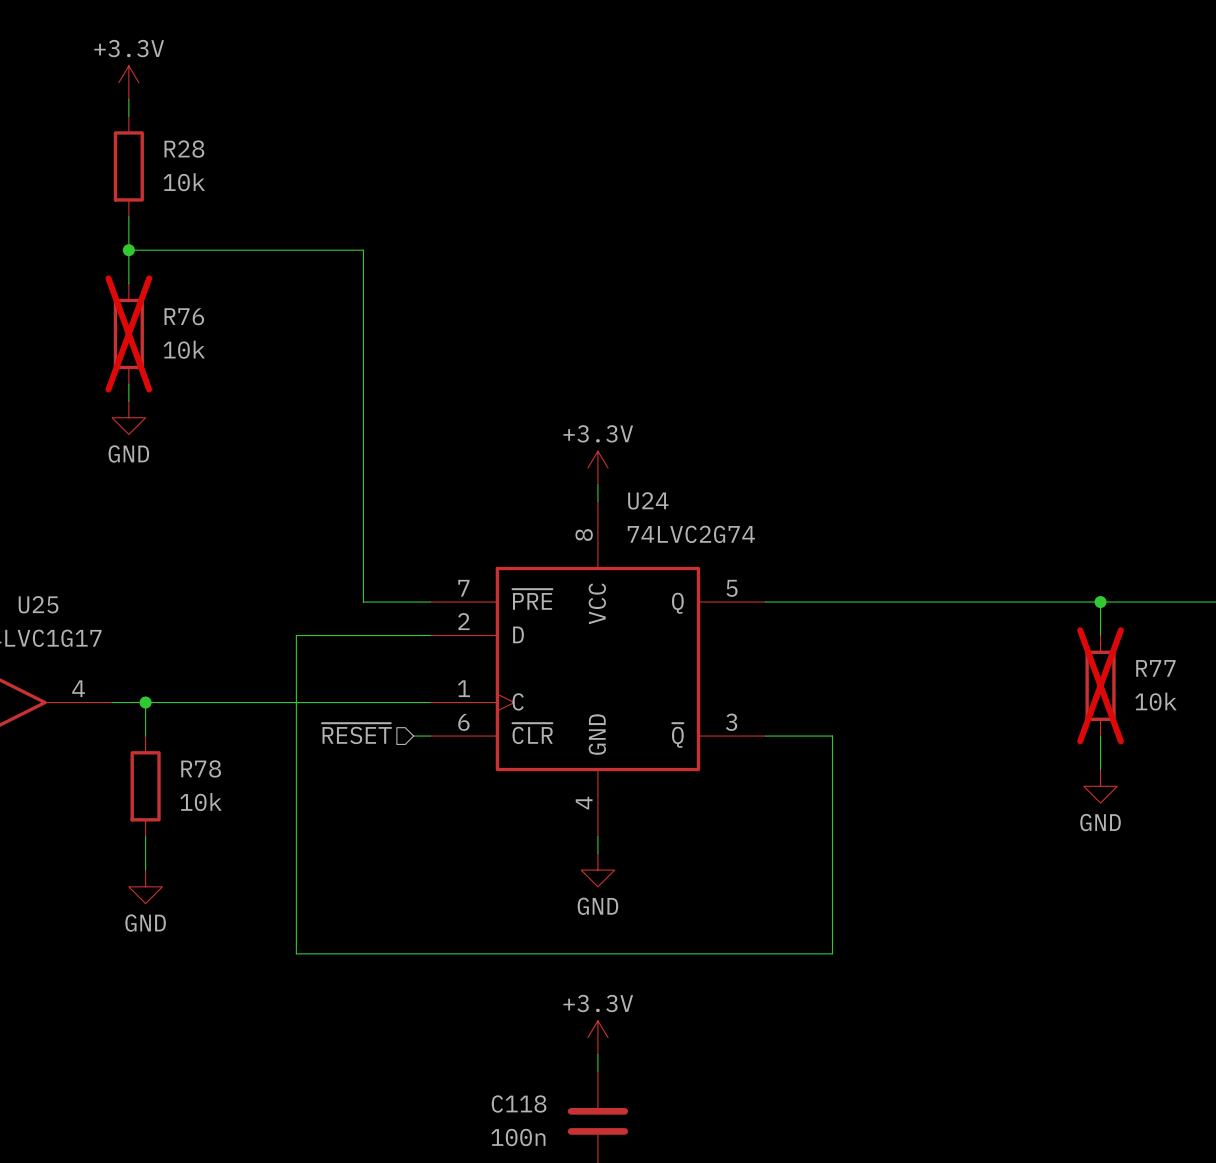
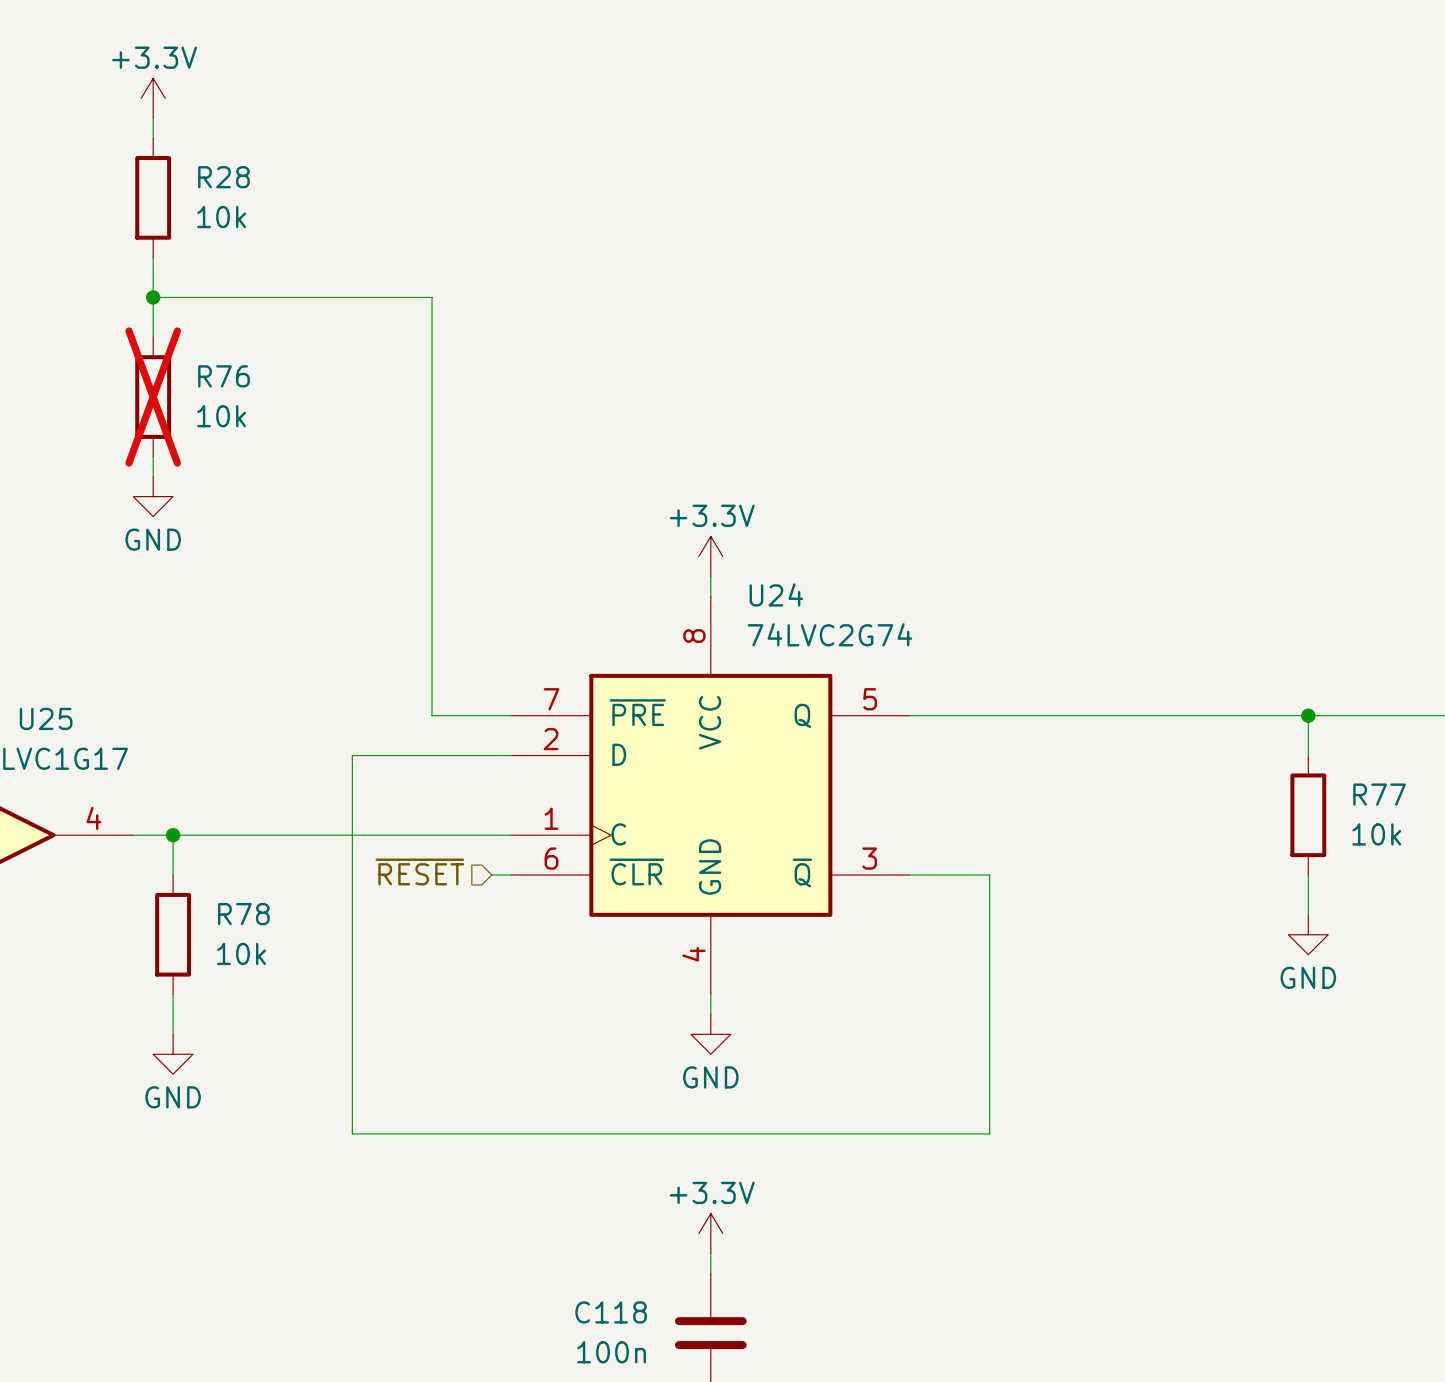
R77 do-not-place cross: (1100, 685) -> none

